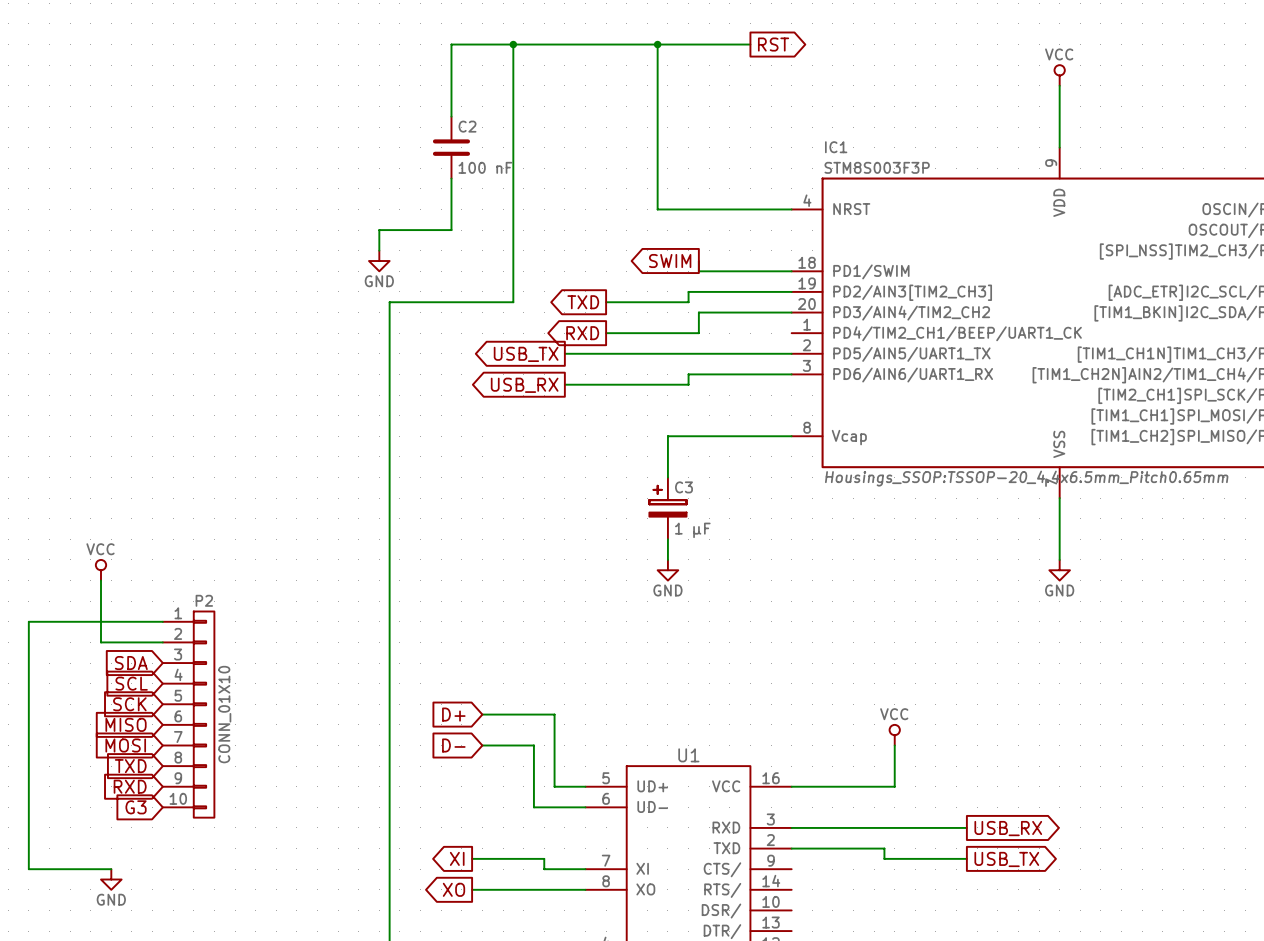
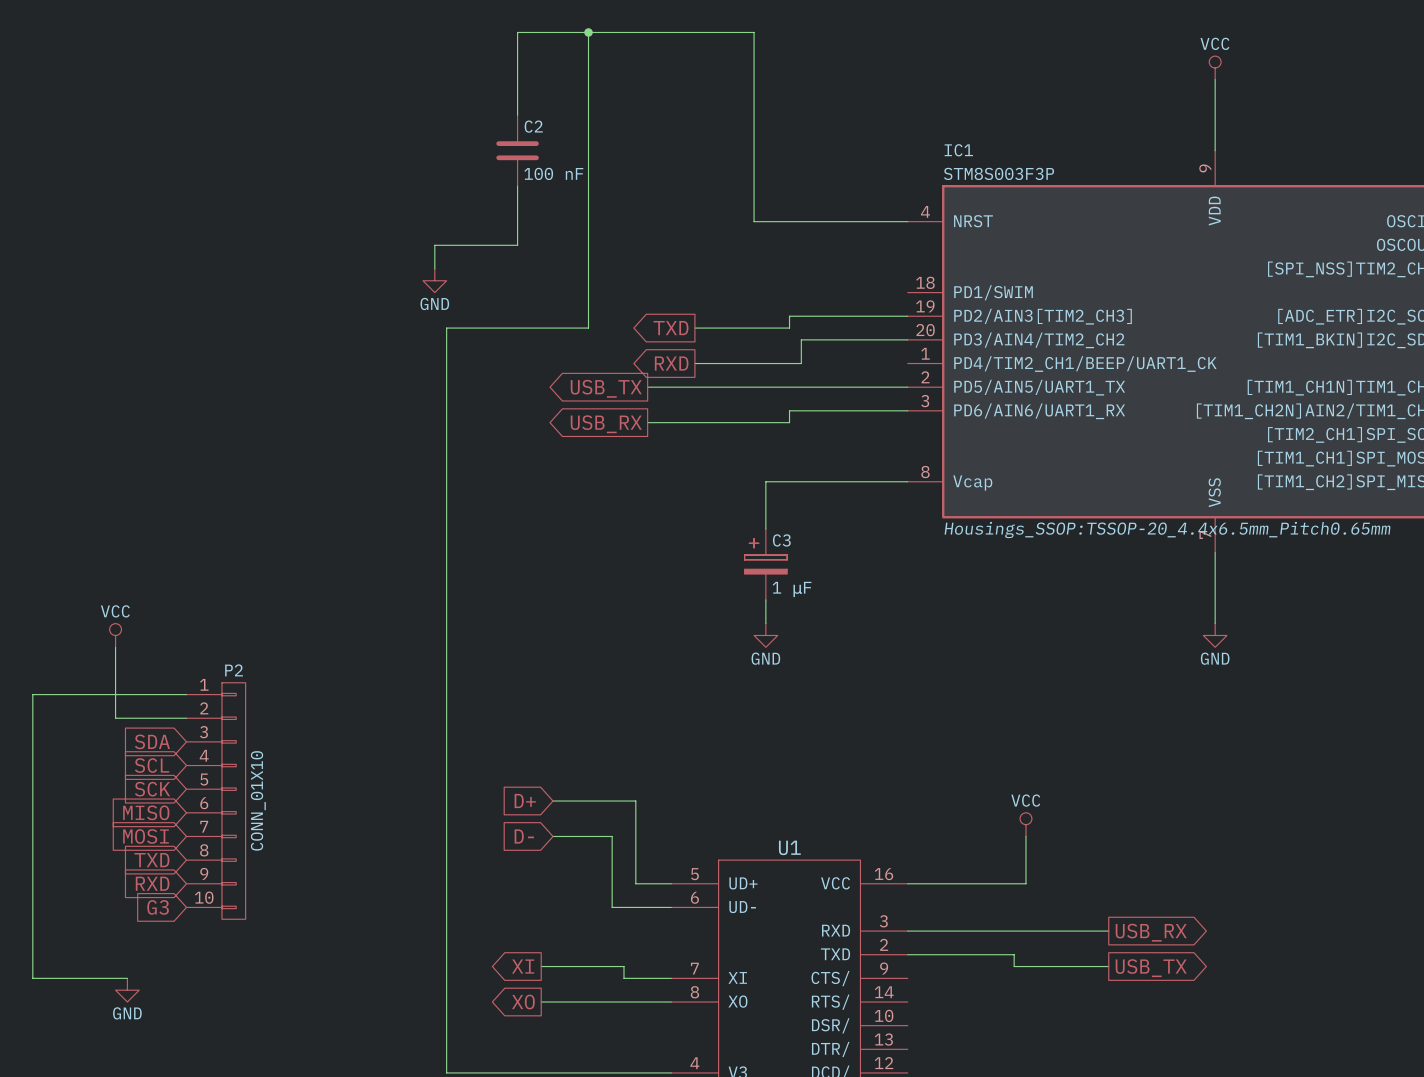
wire: (657, 44) (750, 44) -> none
junction: (657, 44) -> none
global label: RST (773, 44) -> none
global label: SWIM (670, 261) -> none
wire: (698, 261) (698, 271) (791, 271) -> none

